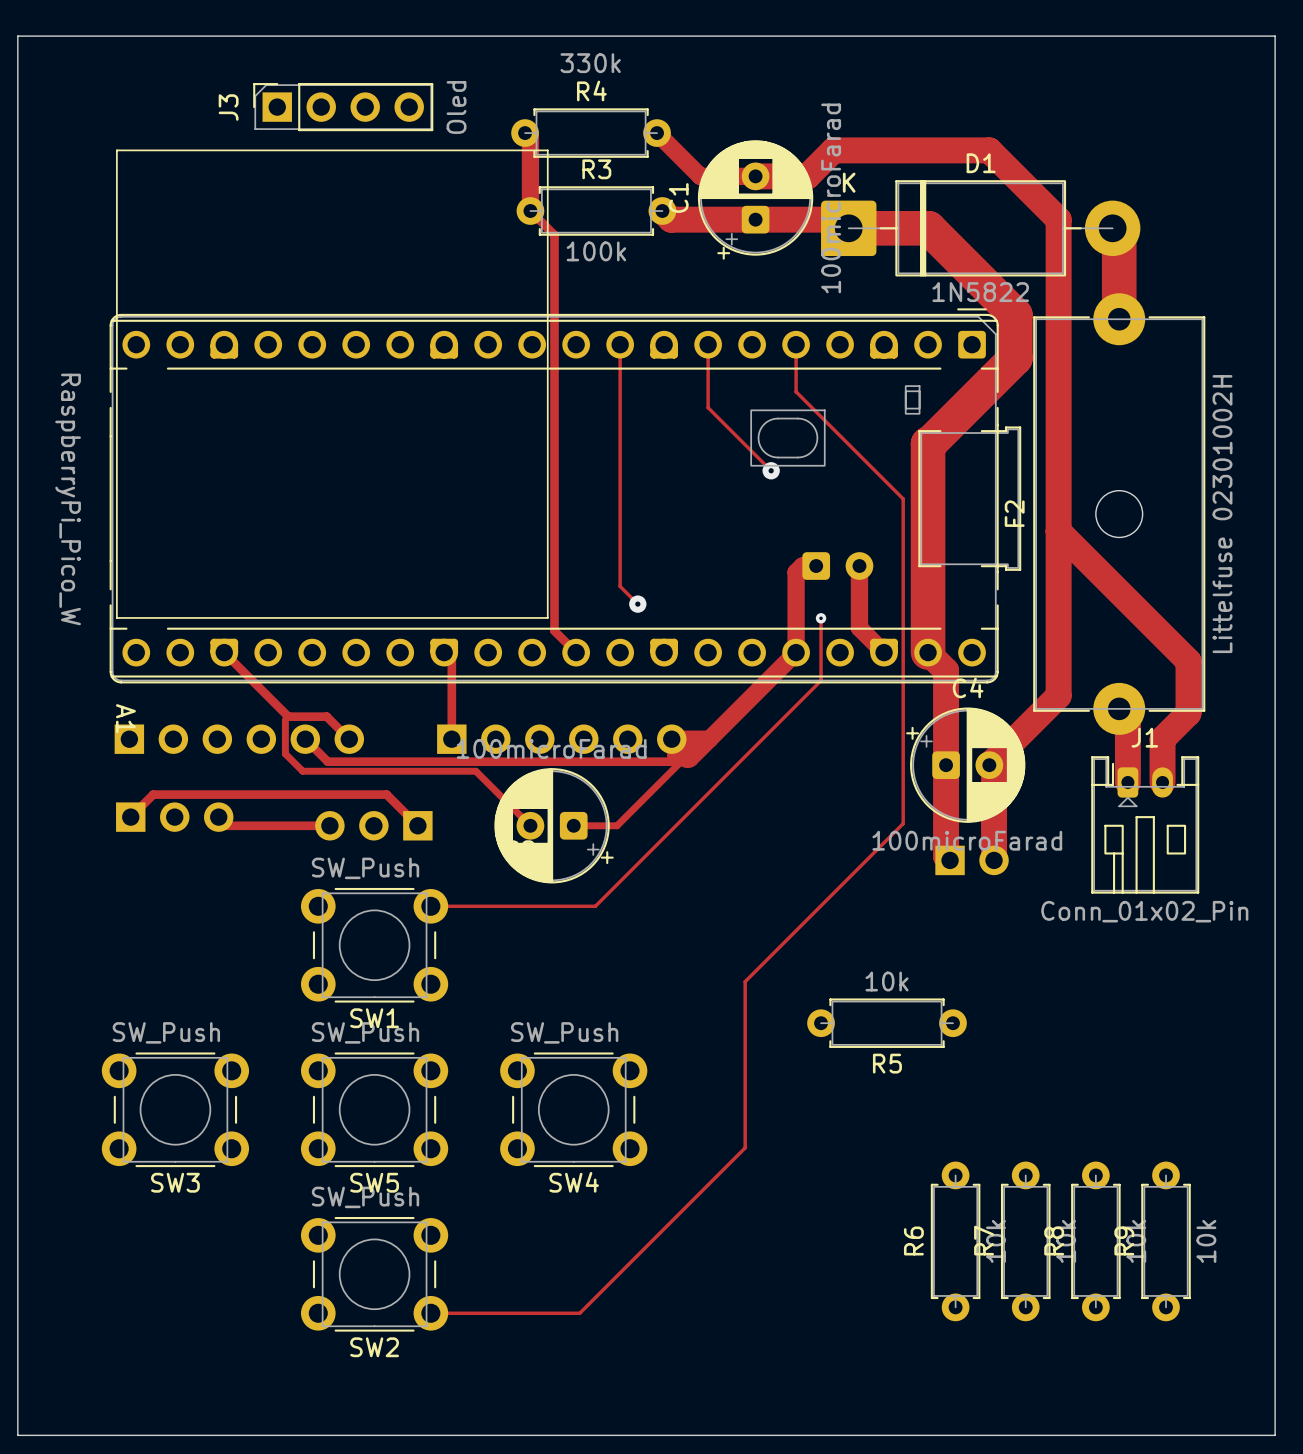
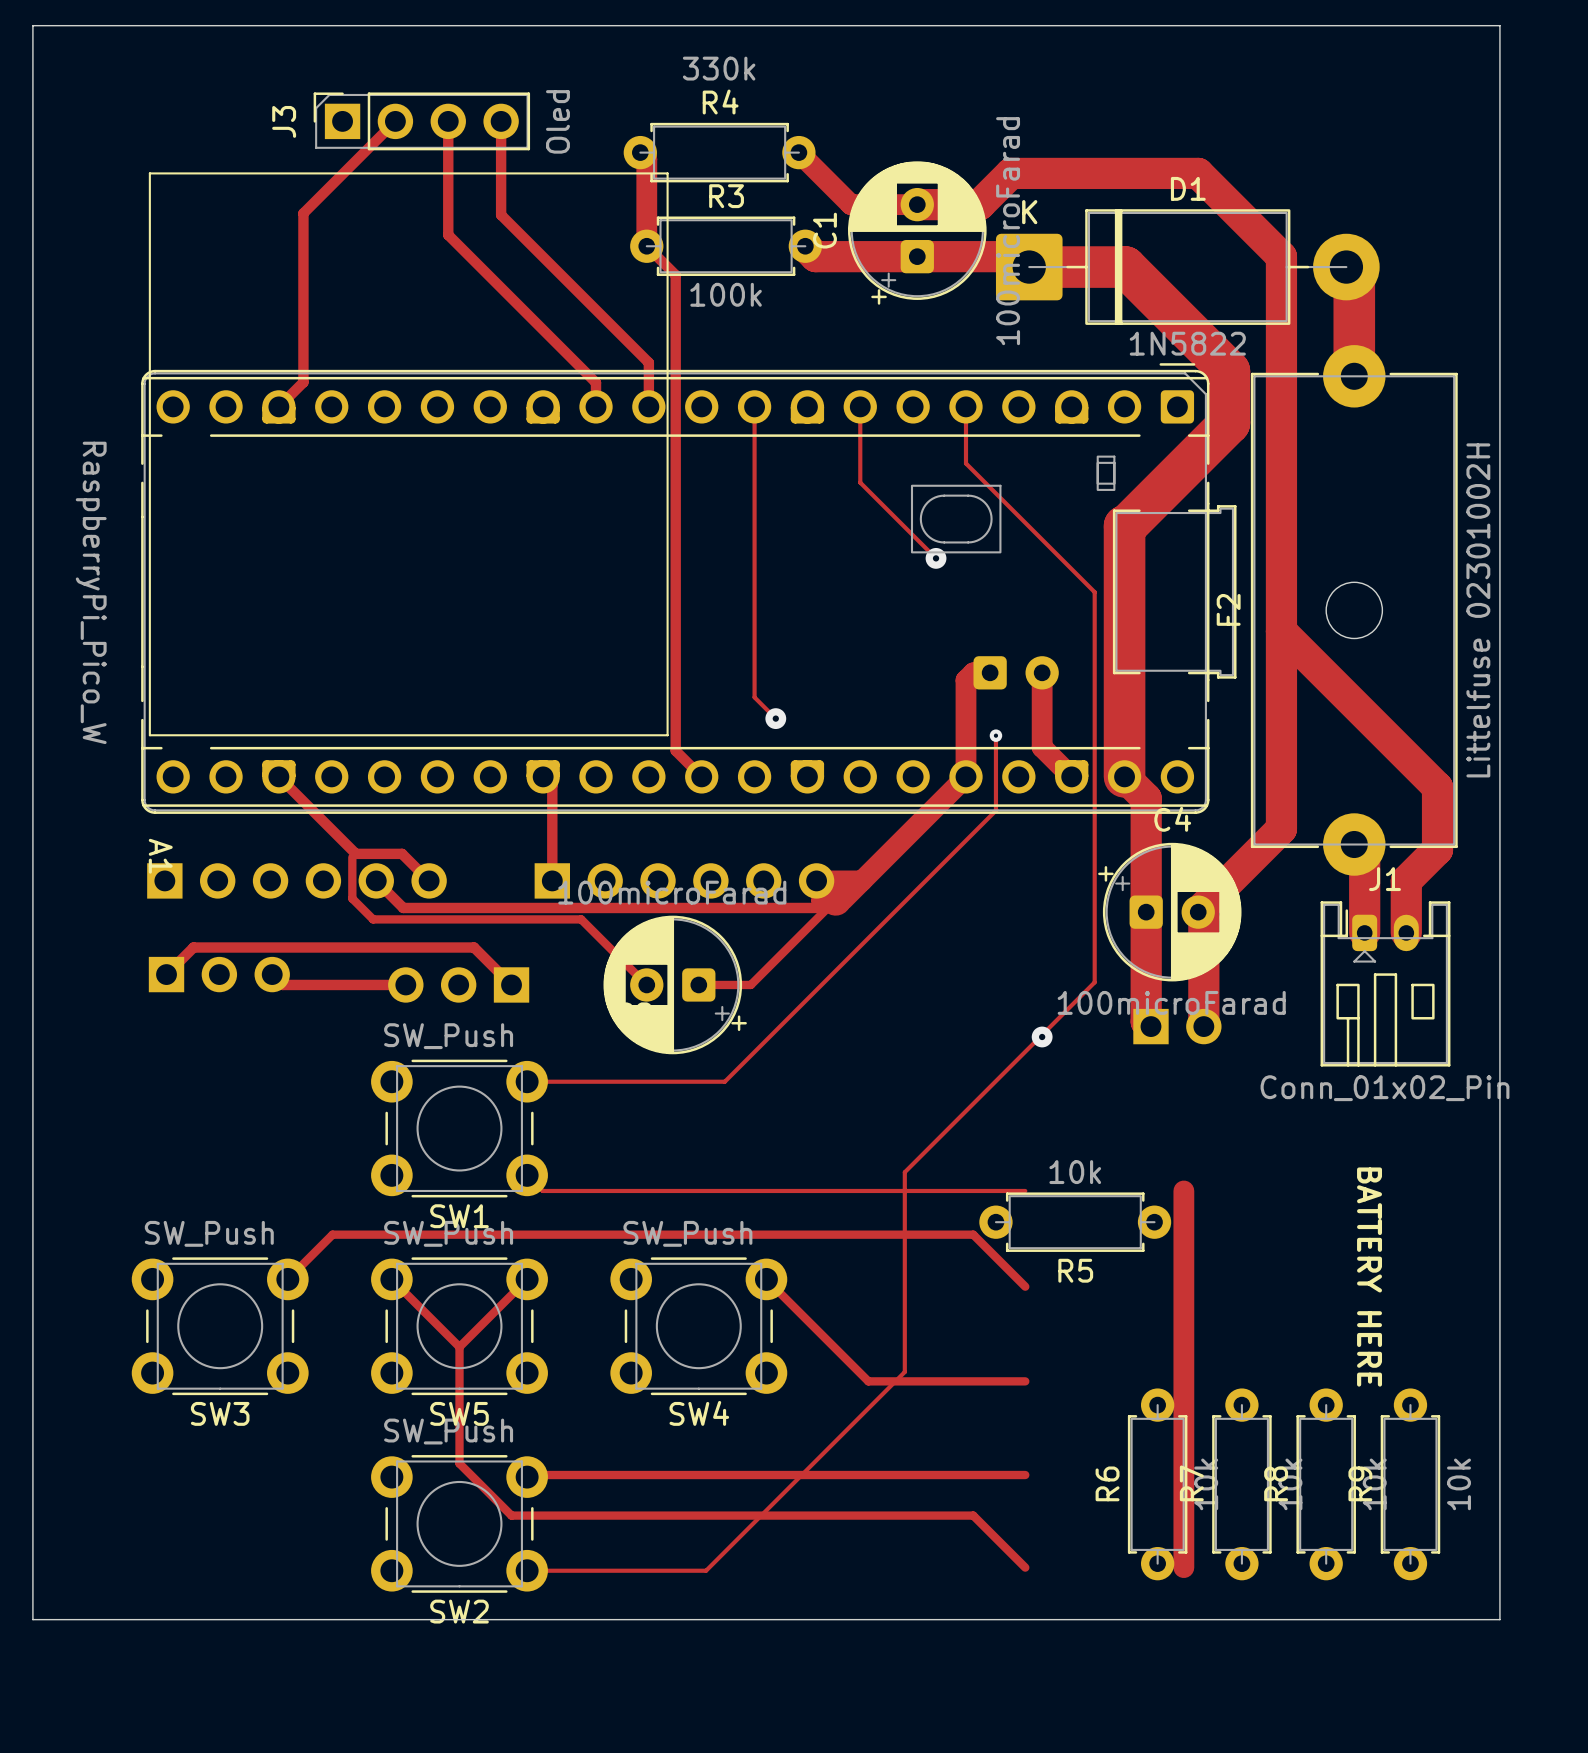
board edge: (17, 36) (1275, 36) (1275, 1435) (17, 1435) (17, 36) -> (32, 25) (32, 1619) (1499, 1619) (1499, 25) (32, 25)
track: none -> (395, 121) (303, 213) (303, 382) (278, 406)
track: none -> (448, 121) (448, 235) (596, 382) (596, 406)
track: none -> (501, 121) (501, 215) (648, 362) (648, 406)
via: none -> (1042, 1036)
track: none -> (527, 1175) (542, 1190) (1025, 1190)
track: none -> (1183, 1190) (1183, 1567)
text: none -> BATTERY HERE (1369, 1277)
track: none -> (287, 1279) (332, 1234) (973, 1234) (1025, 1286)
track: none -> (391, 1279) (459, 1347)
track: none -> (527, 1279) (459, 1347)
track: none -> (766, 1279) (868, 1381) (1025, 1381)
track: none -> (459, 1347) (459, 1463) (511, 1515) (973, 1515) (1025, 1567)
track: none -> (1025, 1475) (529, 1475) (527, 1477)

